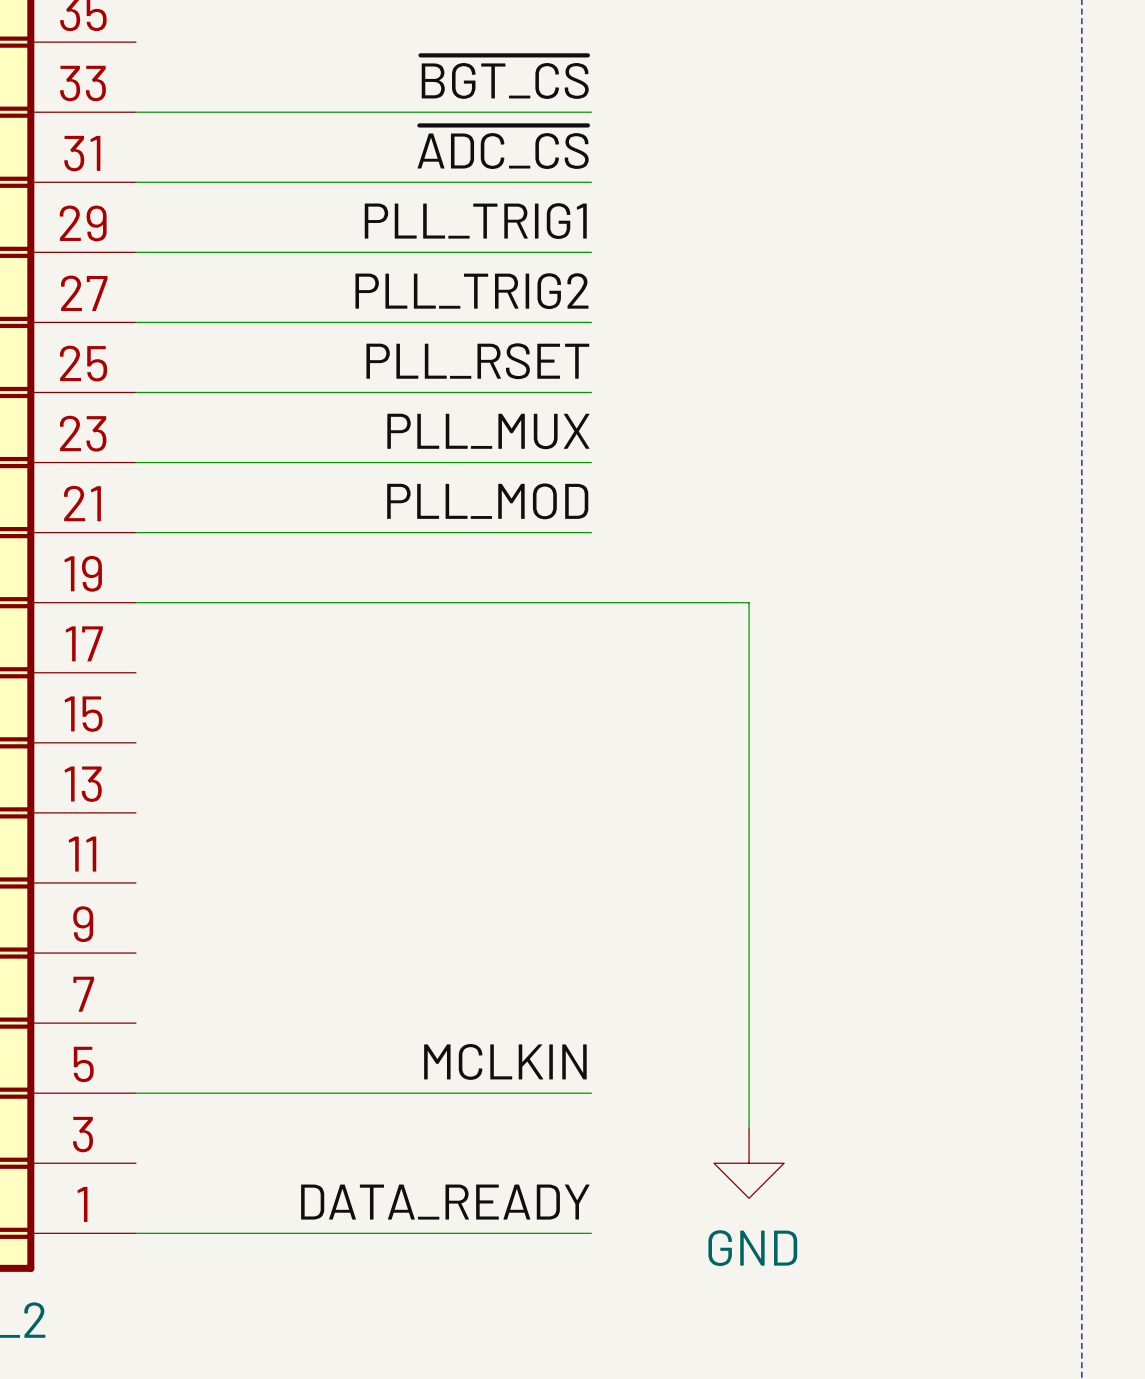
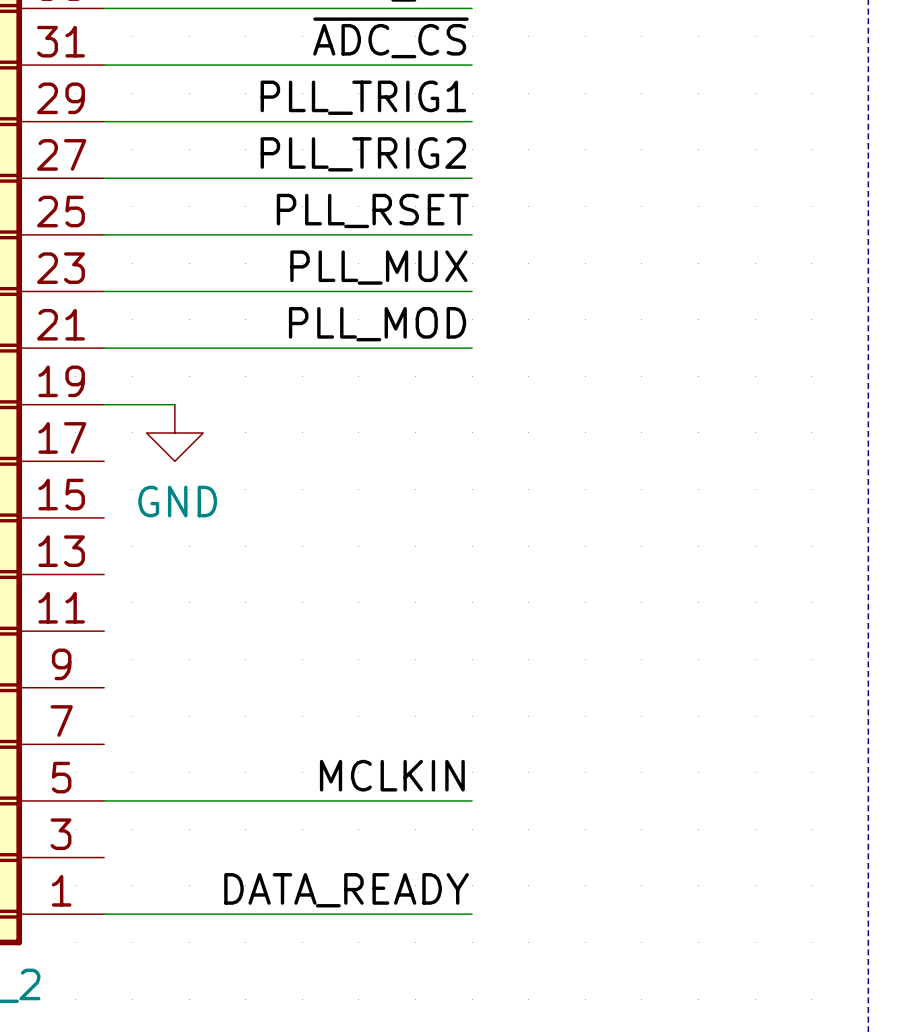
wire: (223, 602) (749, 602) (749, 1128) -> none
power symbol: none -> GND (174, 432)
power symbol: GND (749, 1163) -> none

